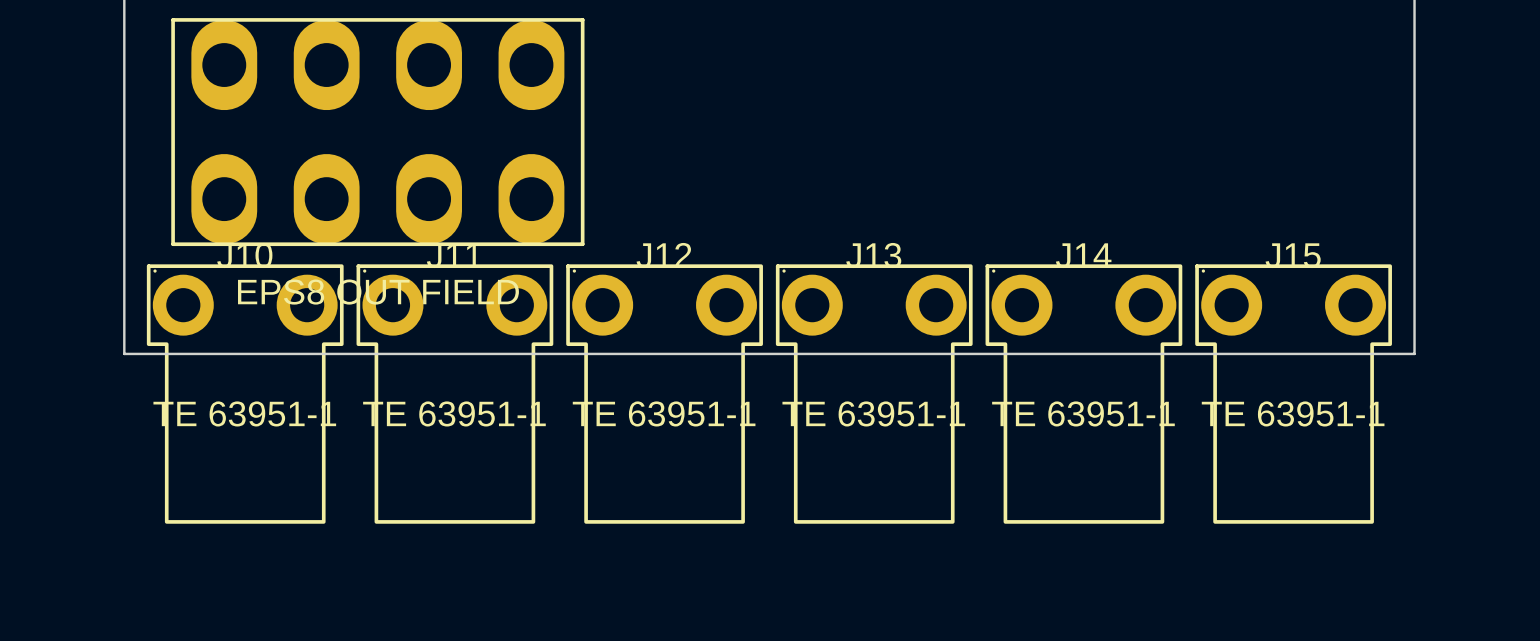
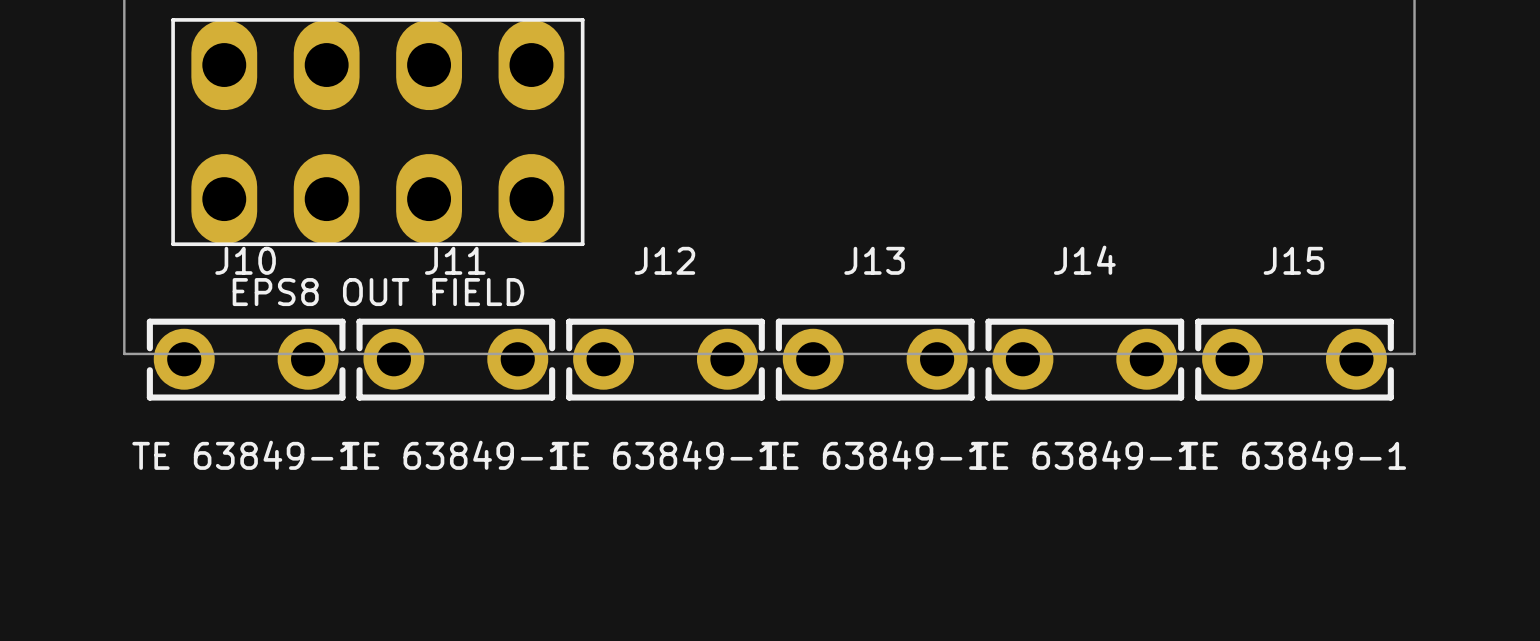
J10 footprint: [146, 264, 344, 524] -> [146, 318, 346, 401]
J11 footprint: [356, 264, 554, 524] -> [356, 318, 556, 401]
J12 footprint: [566, 264, 763, 524] -> [566, 318, 765, 401]
J13 footprint: [775, 264, 973, 524] -> [775, 318, 975, 401]
J14 footprint: [985, 264, 1183, 524] -> [985, 318, 1185, 401]
J15 footprint: [1195, 264, 1392, 524] -> [1195, 318, 1394, 401]
J10 value: TE 63951-1 (244, 413) -> TE 63849-1 (245, 455)
J11 value: TE 63951-1 (454, 413) -> TE 63849-1 (454, 455)
J12 value: TE 63951-1 (664, 413) -> TE 63849-1 (664, 455)
J13 value: TE 63951-1 (873, 413) -> TE 63849-1 (874, 455)
J14 value: TE 63951-1 (1083, 413) -> TE 63849-1 (1083, 455)
J15 value: TE 63951-1 (1293, 413) -> TE 63849-1 (1293, 455)

